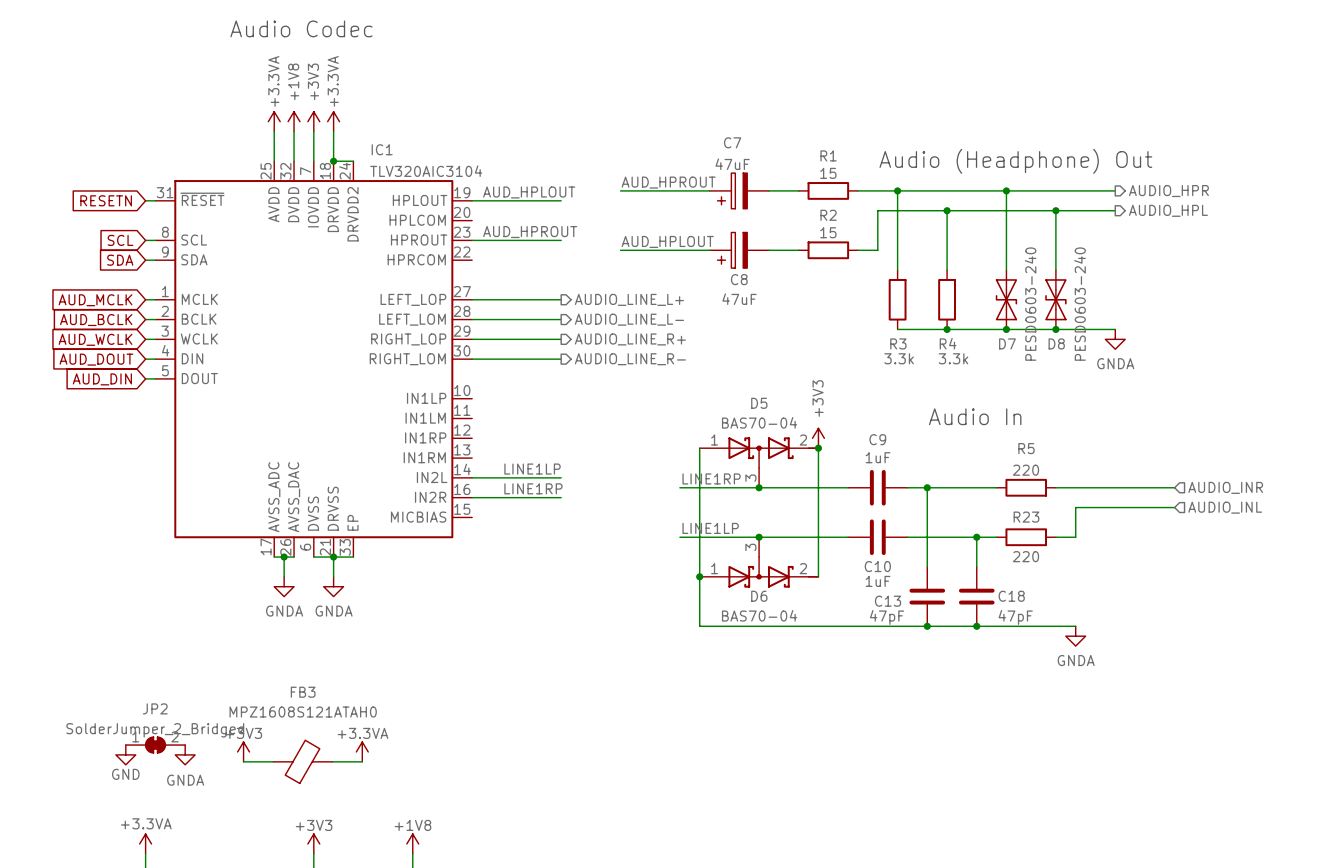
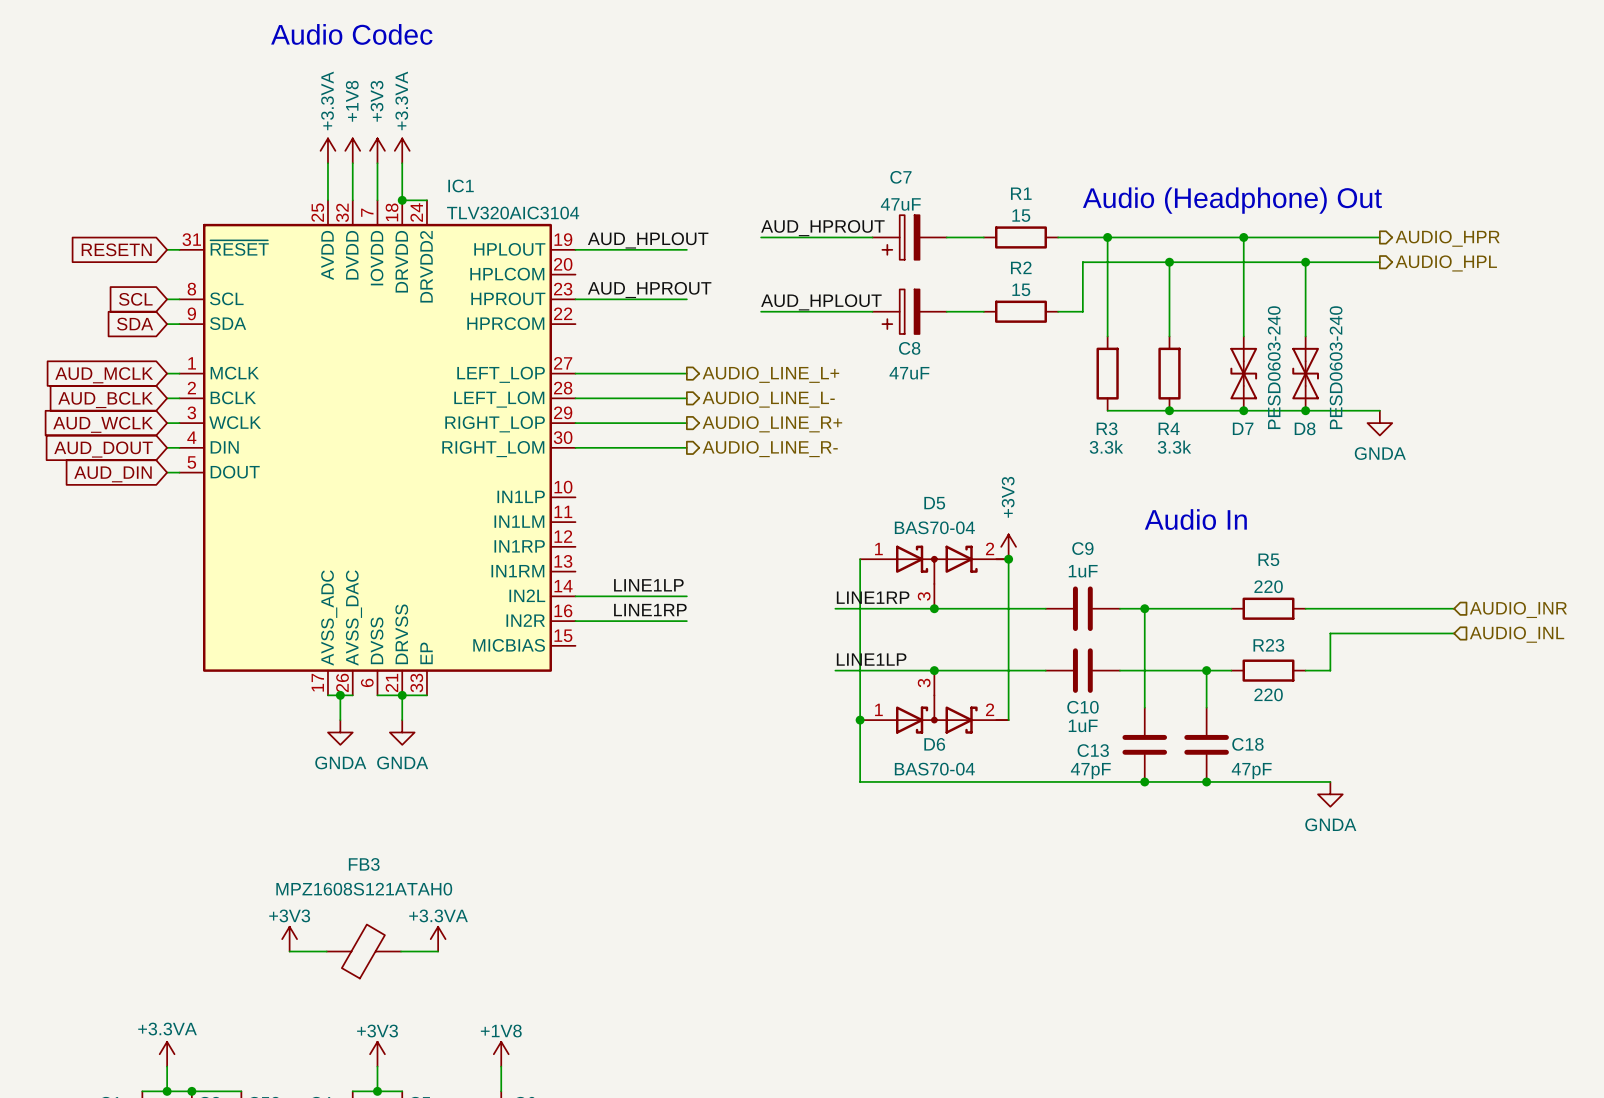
JP2: SolderJumper_2_Bridged (155, 745) -> none
power symbol: GND (125, 754) -> none
power symbol: GNDA (185, 754) -> none

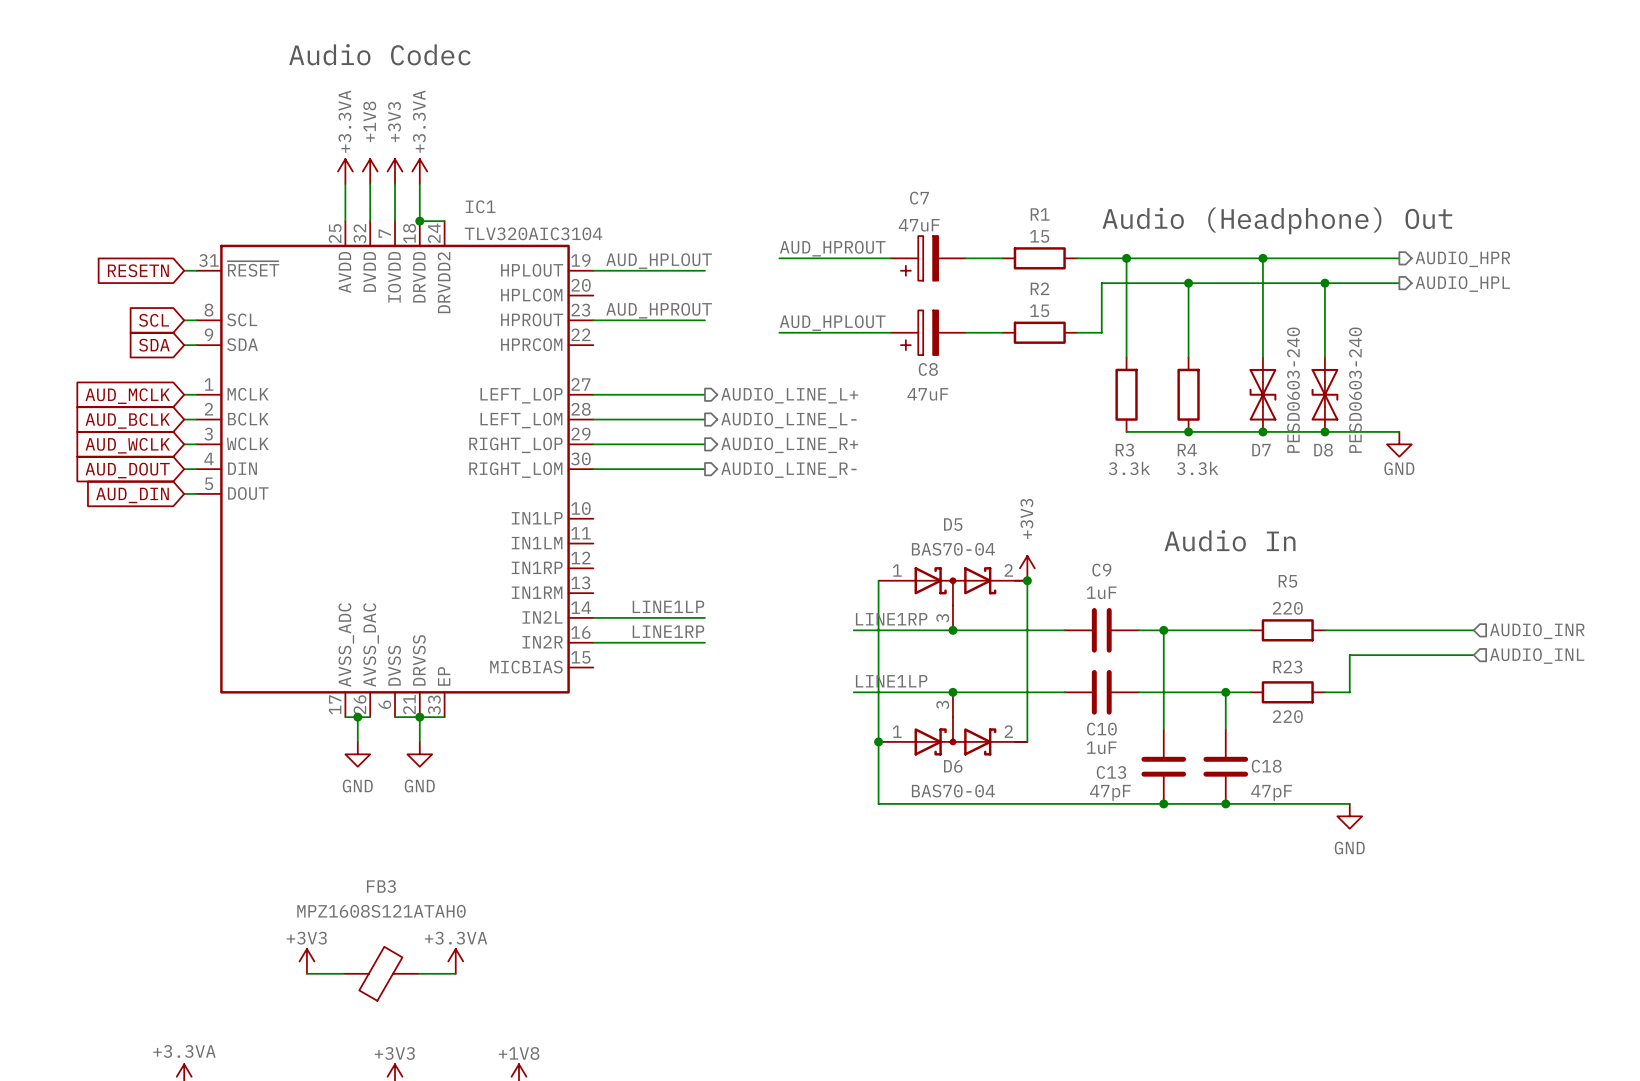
power symbol: GNDA (1379, 423) -> GND (1399, 444)
power symbol: GNDA (340, 732) -> GND (357, 754)
power symbol: GNDA (402, 732) -> GND (419, 754)
power symbol: GNDA (1330, 794) -> GND (1349, 816)

